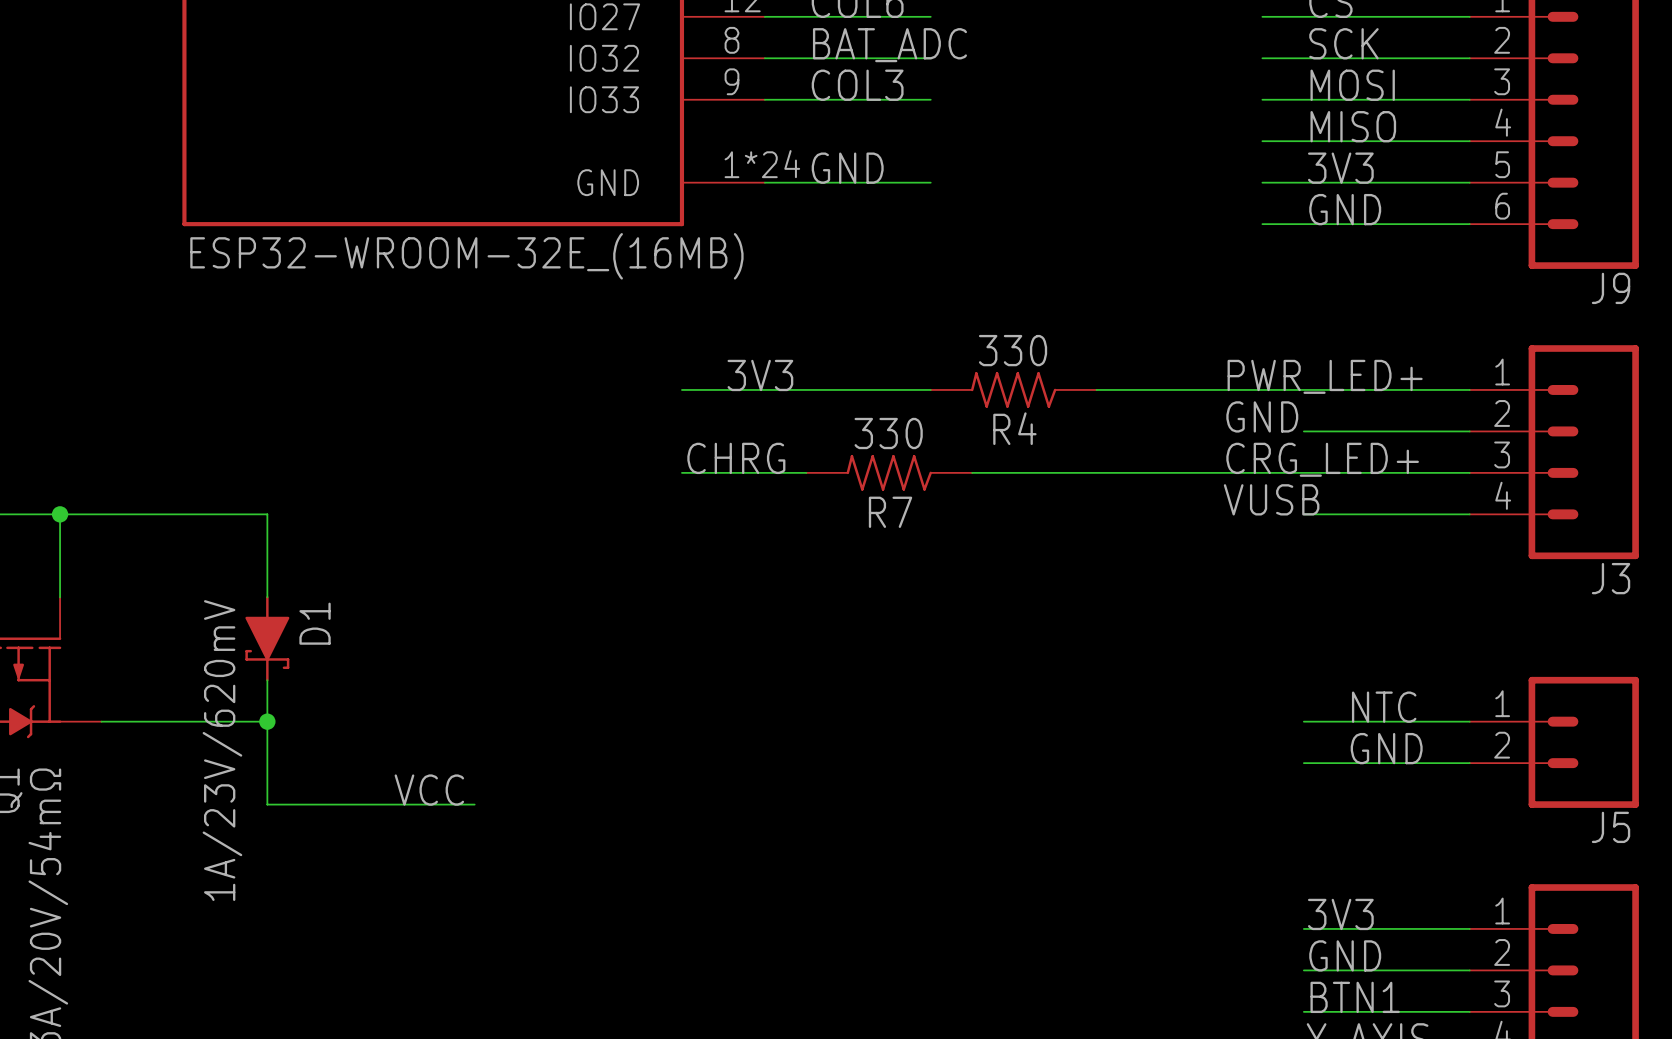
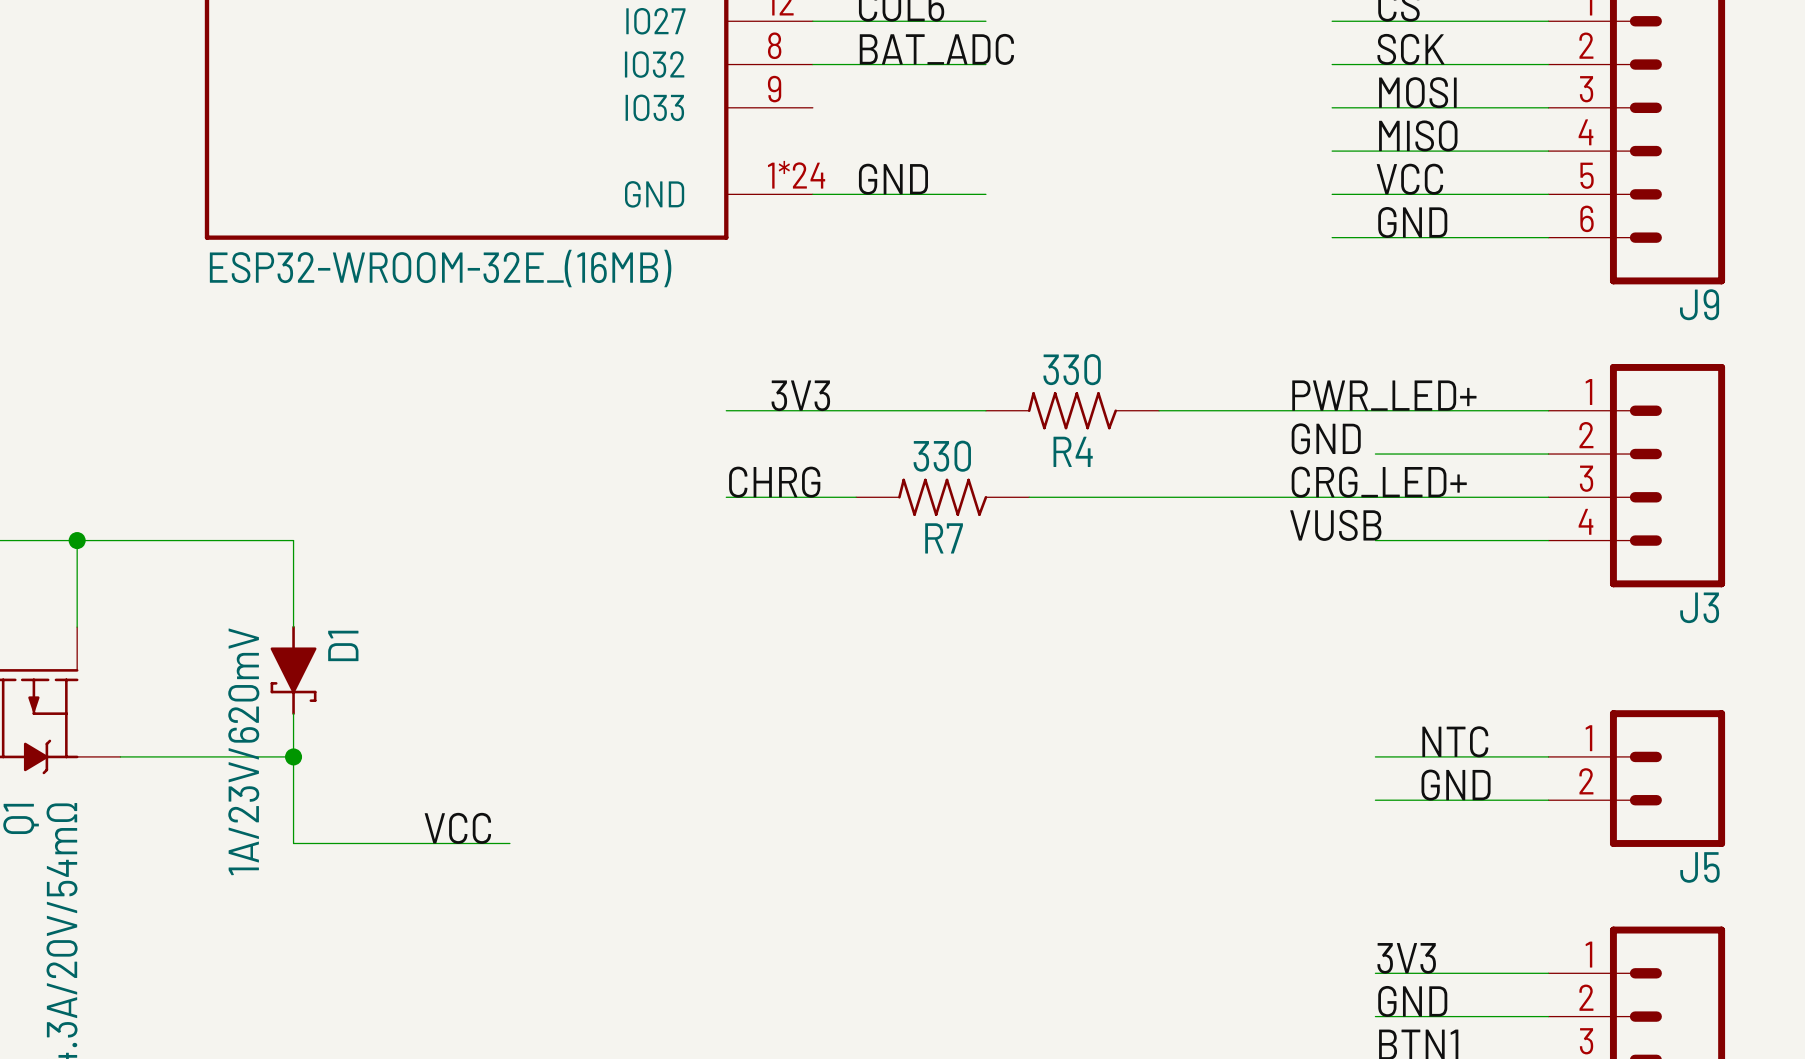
label: COL3 (857, 85) -> none
wire: (764, 99) (930, 99) -> none
label: 3V3 (1340, 168) -> VCC (1409, 179)

